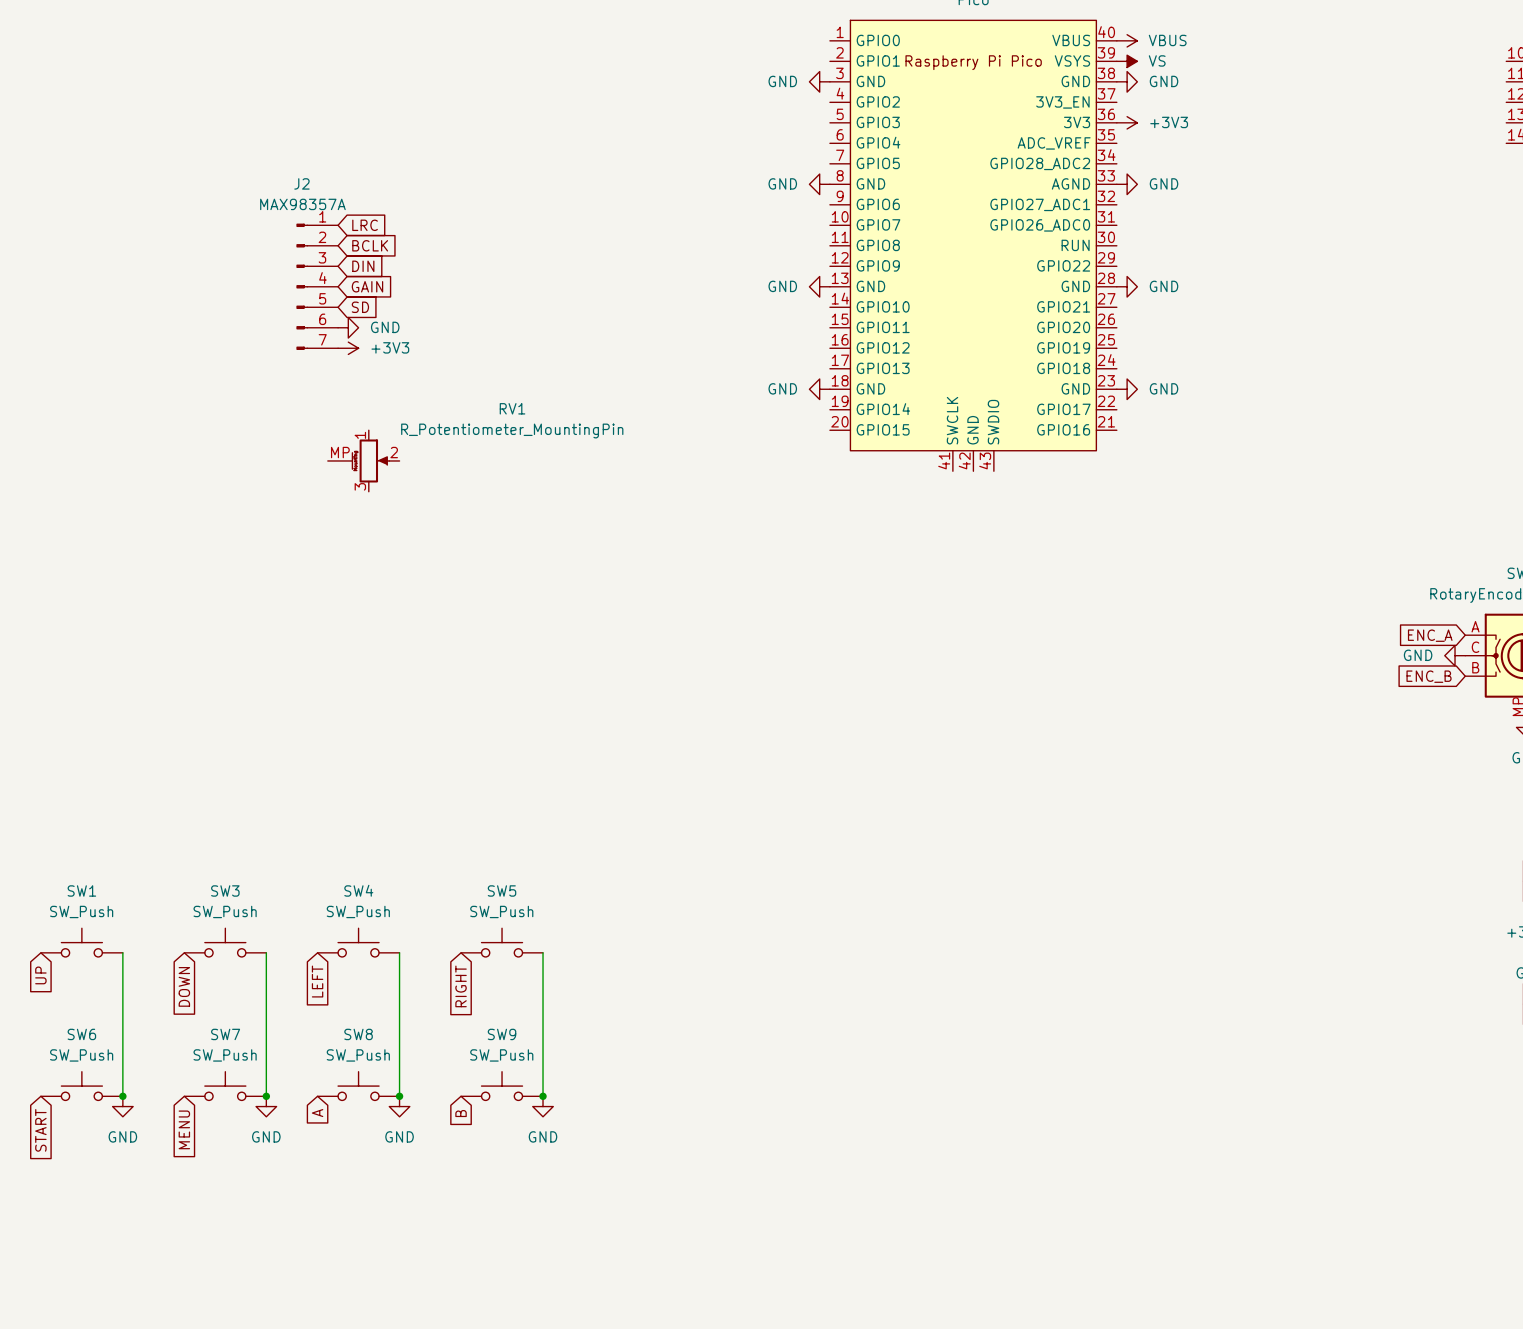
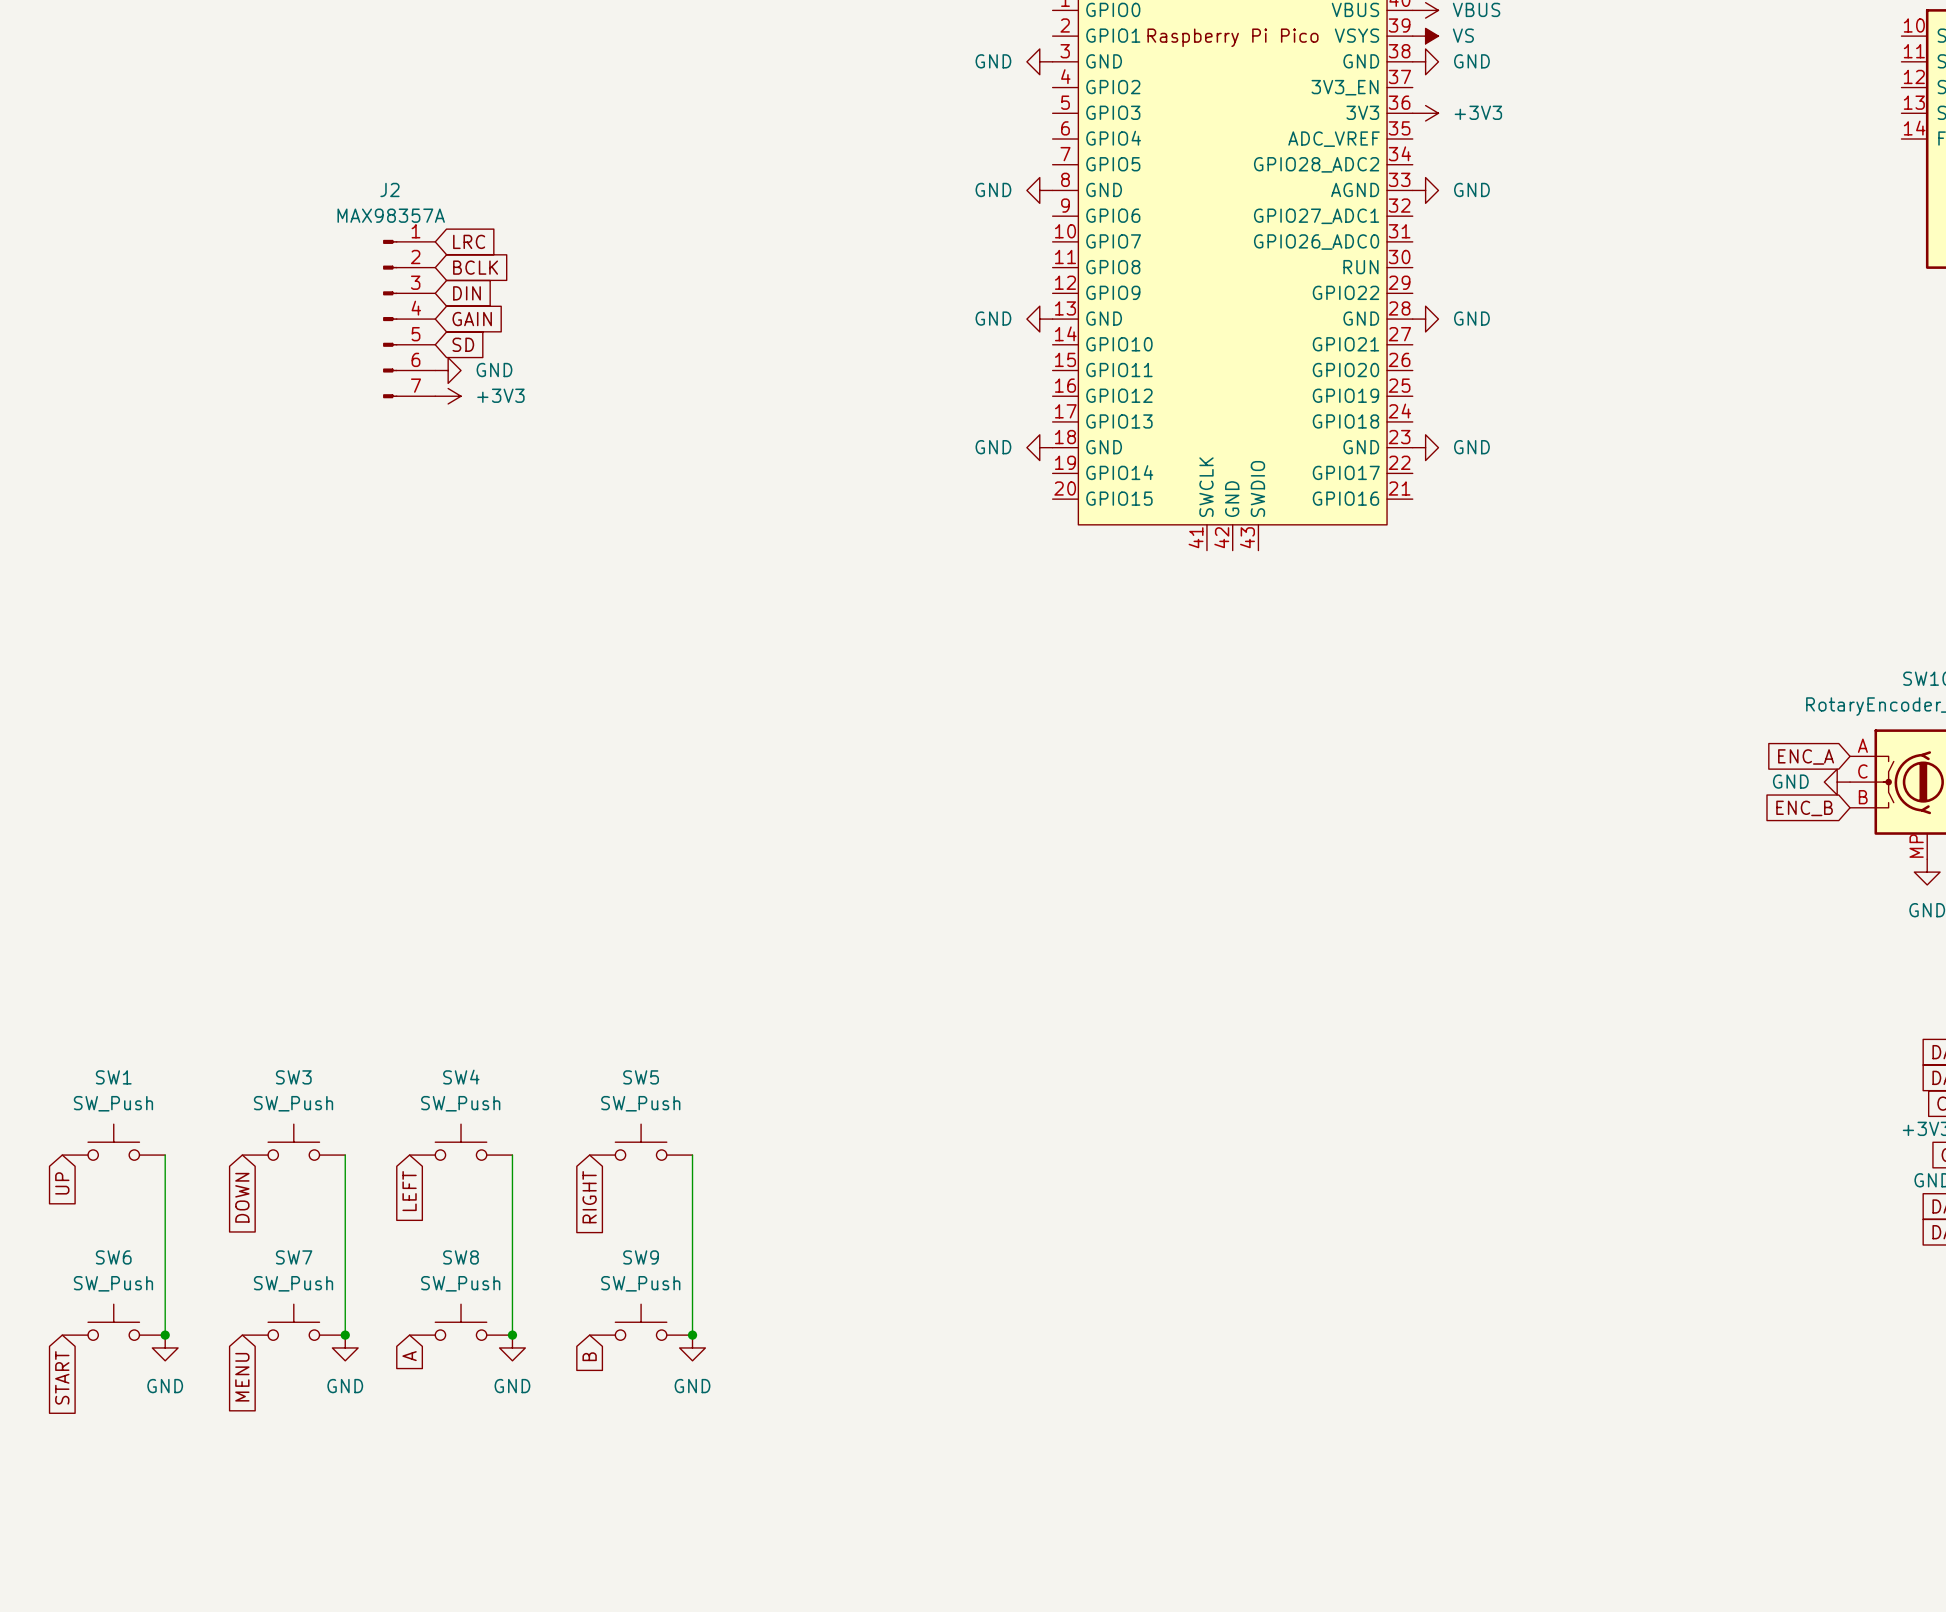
RV1: R_Potentiometer_MountingPin (363, 460) -> none

